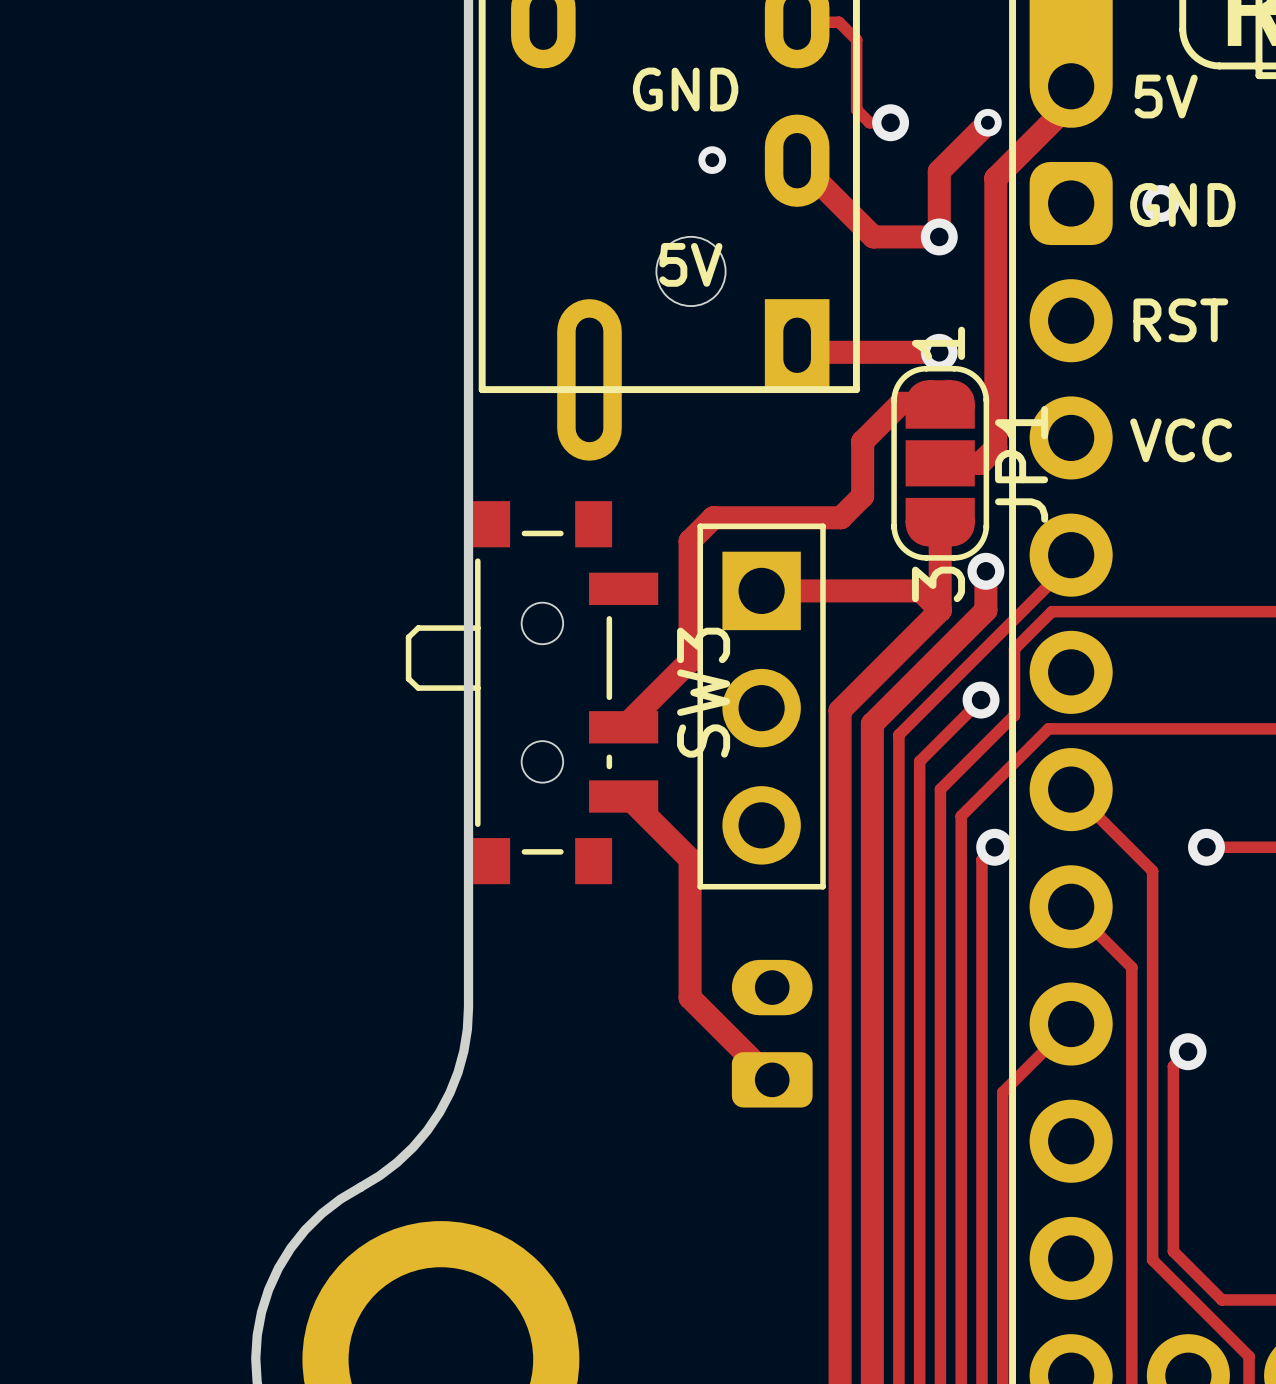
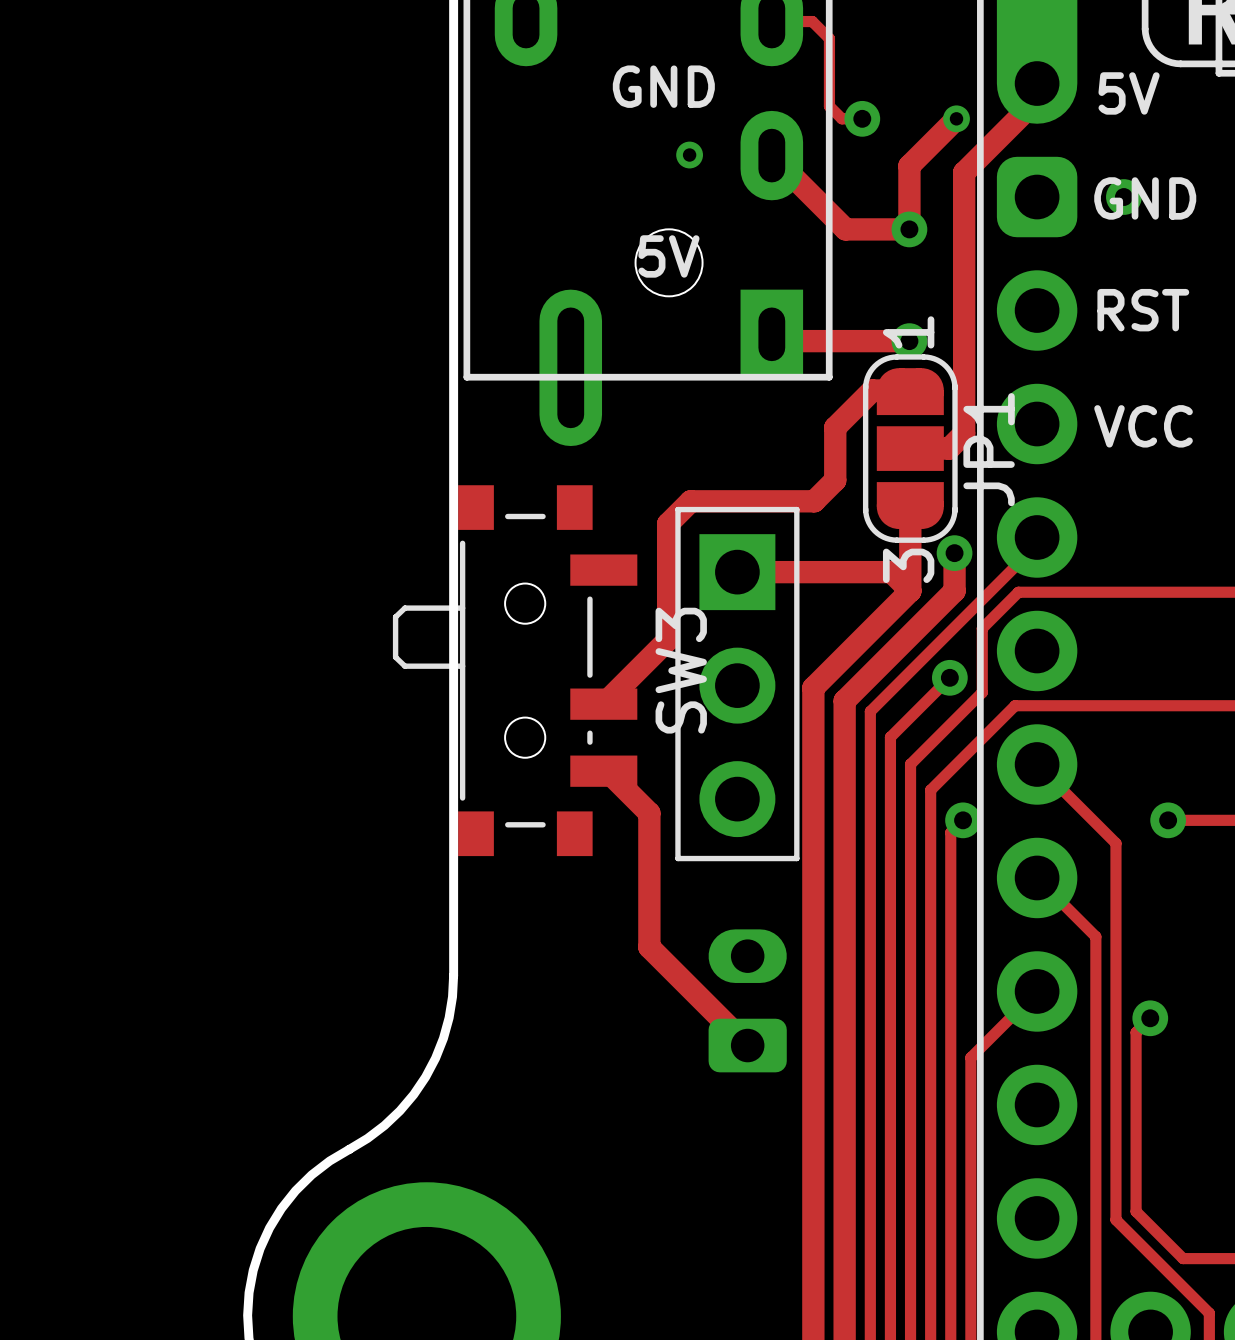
track: (670, 839) (690, 859) (690, 997) -> (649, 813) (649, 947) (668, 966)

